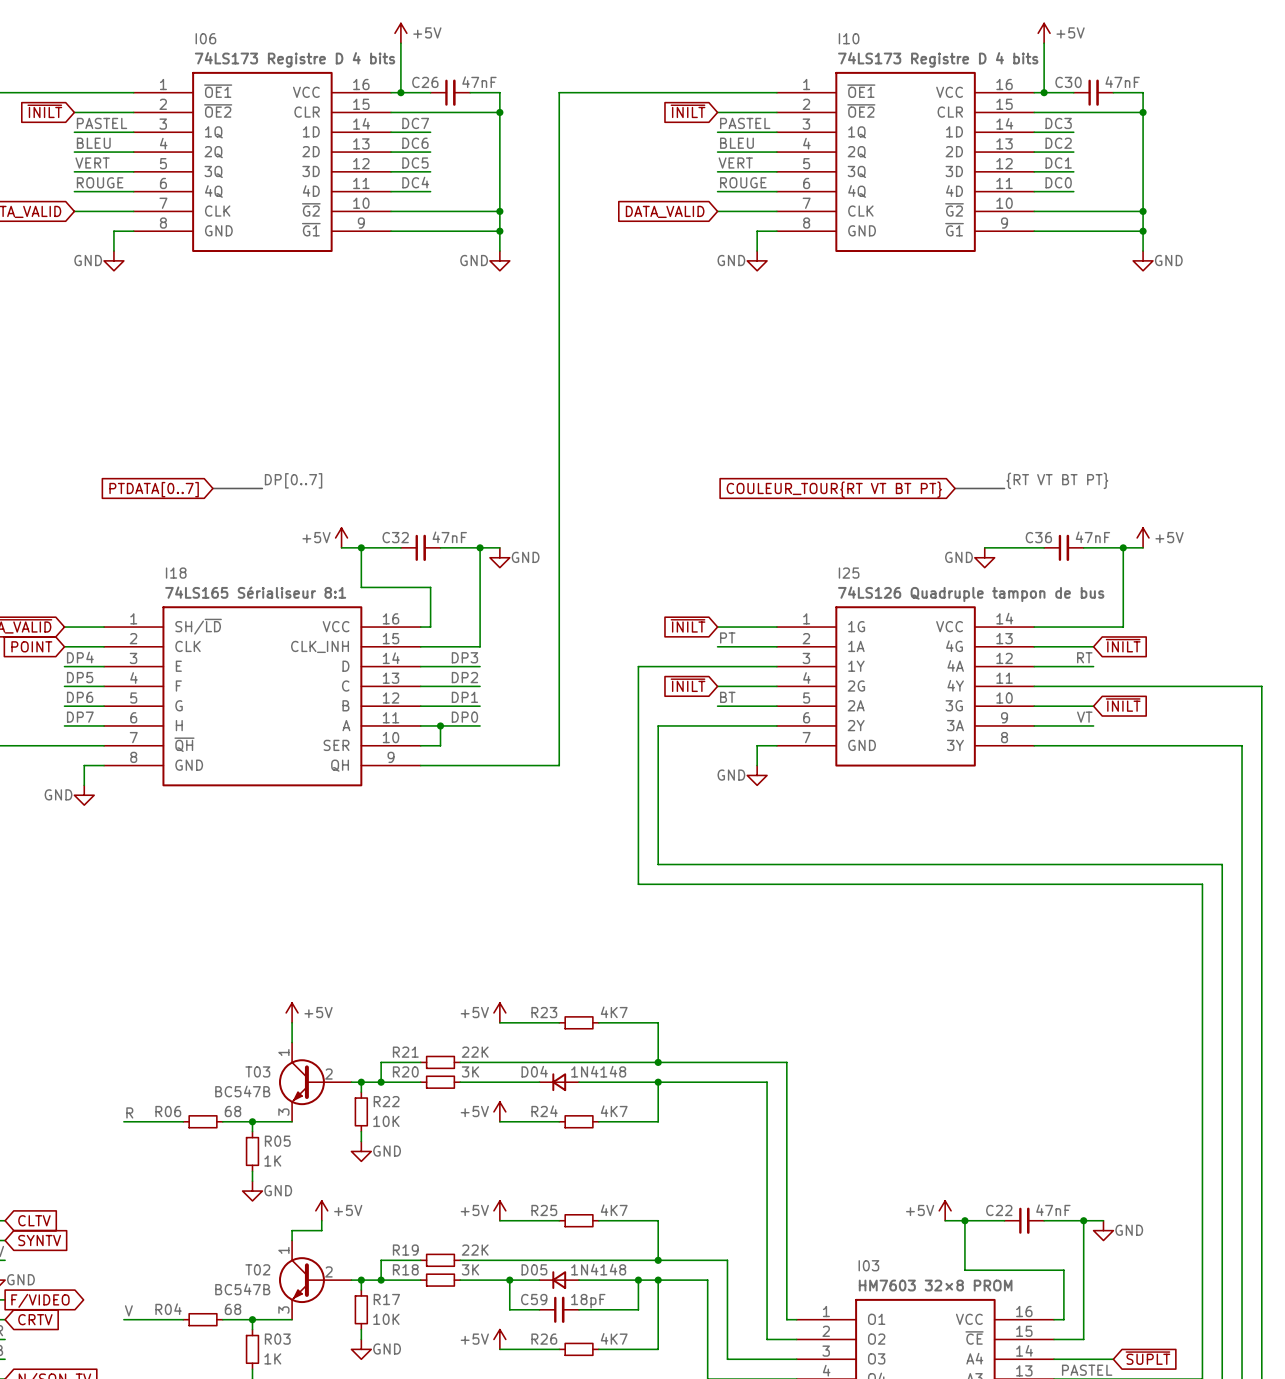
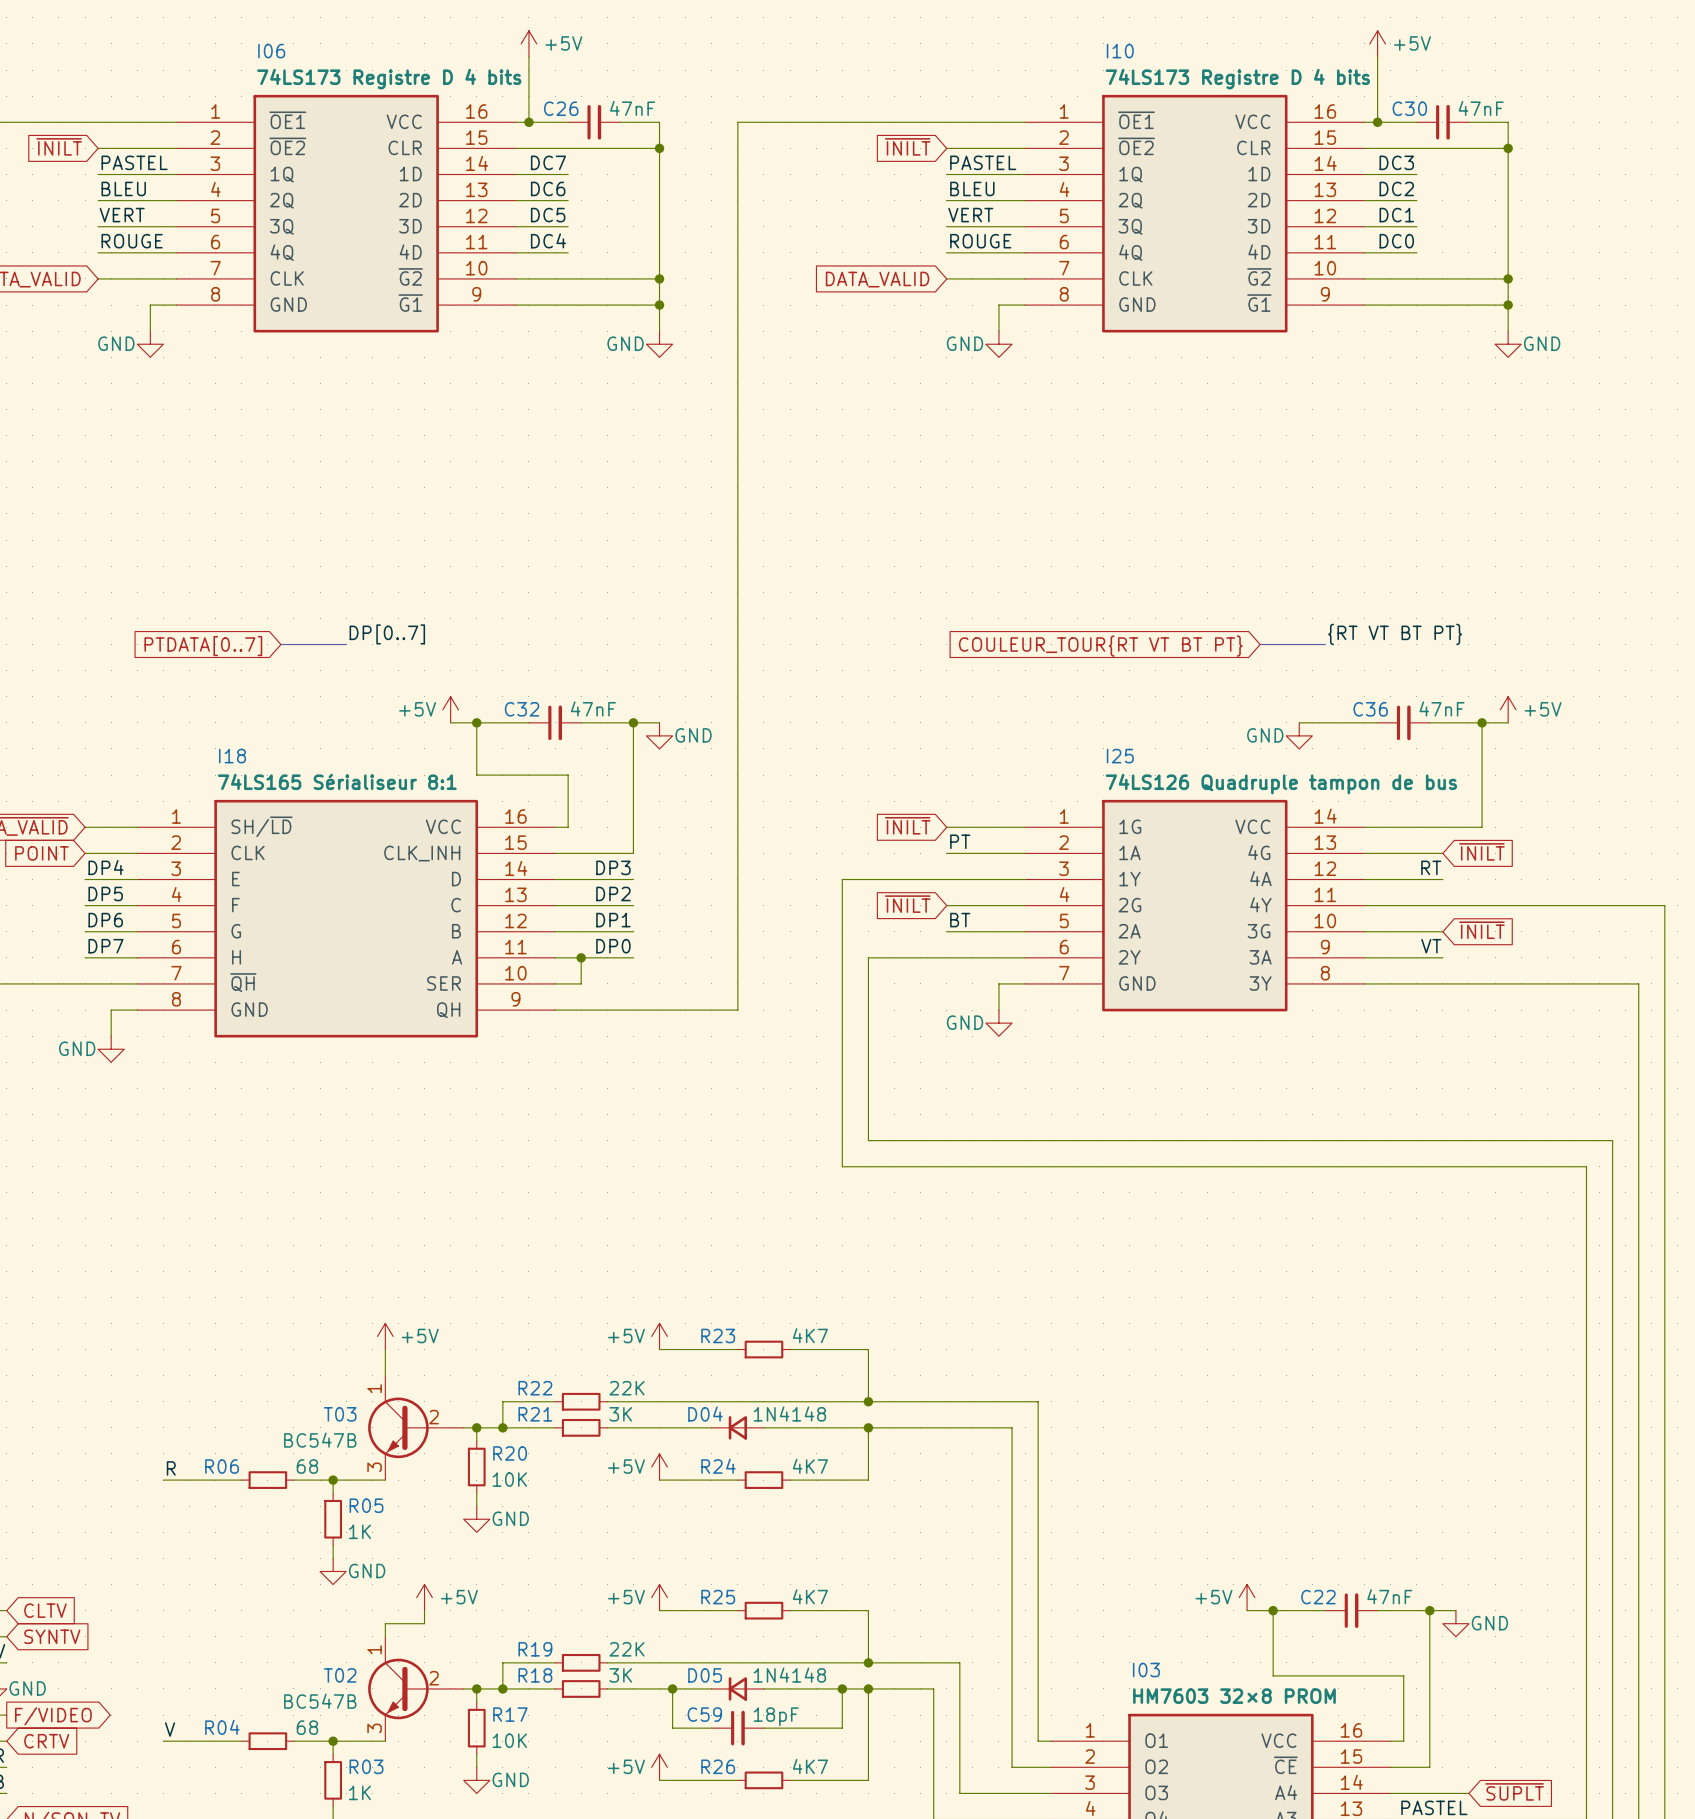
R21 name: R21 (405, 1052) -> R22 (535, 1388)
R20 name: R20 (405, 1071) -> R21 (535, 1414)
R22 name: R22 (386, 1101) -> R20 (510, 1453)

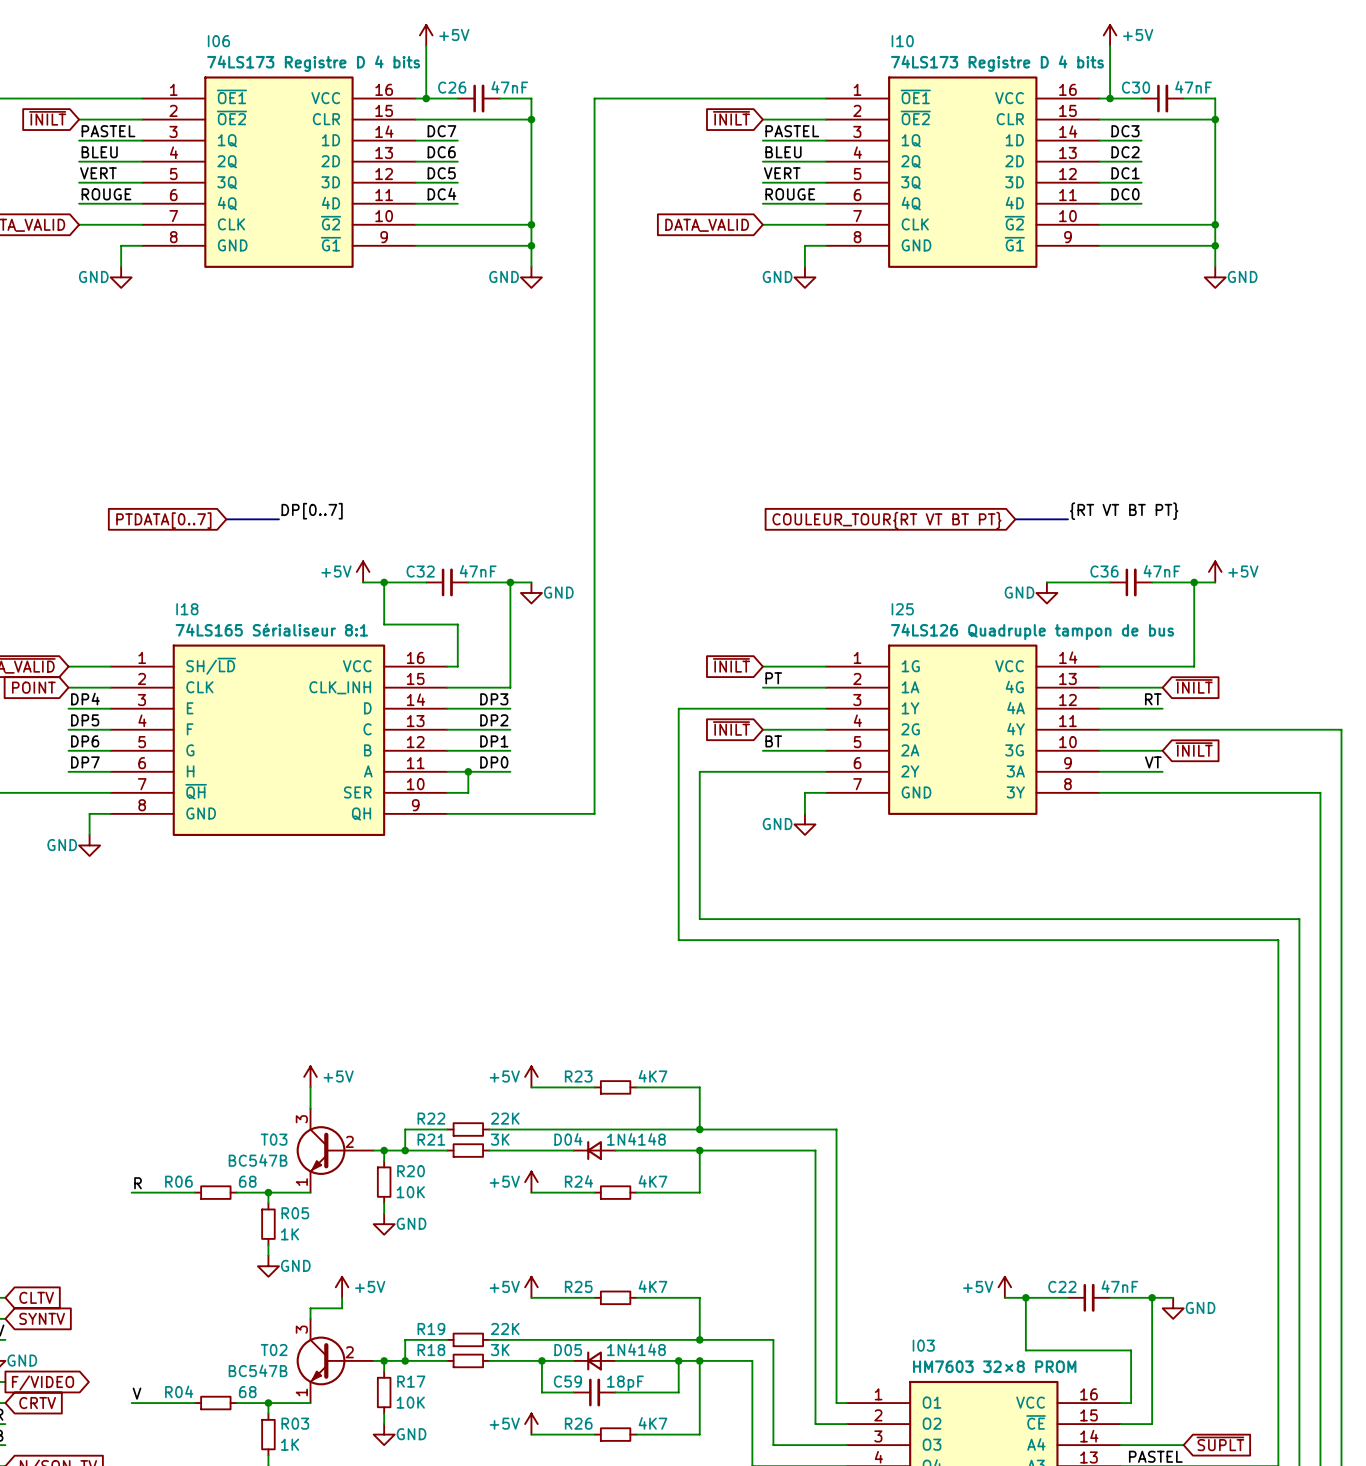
T03 pin number: 1 (374, 1388) -> 3 (301, 1119)
T03 pin number: 3 (374, 1467) -> 1 (301, 1182)
T02 pin number: 1 (374, 1649) -> 3 (301, 1329)
T02 pin number: 3 (374, 1728) -> 1 (301, 1392)

